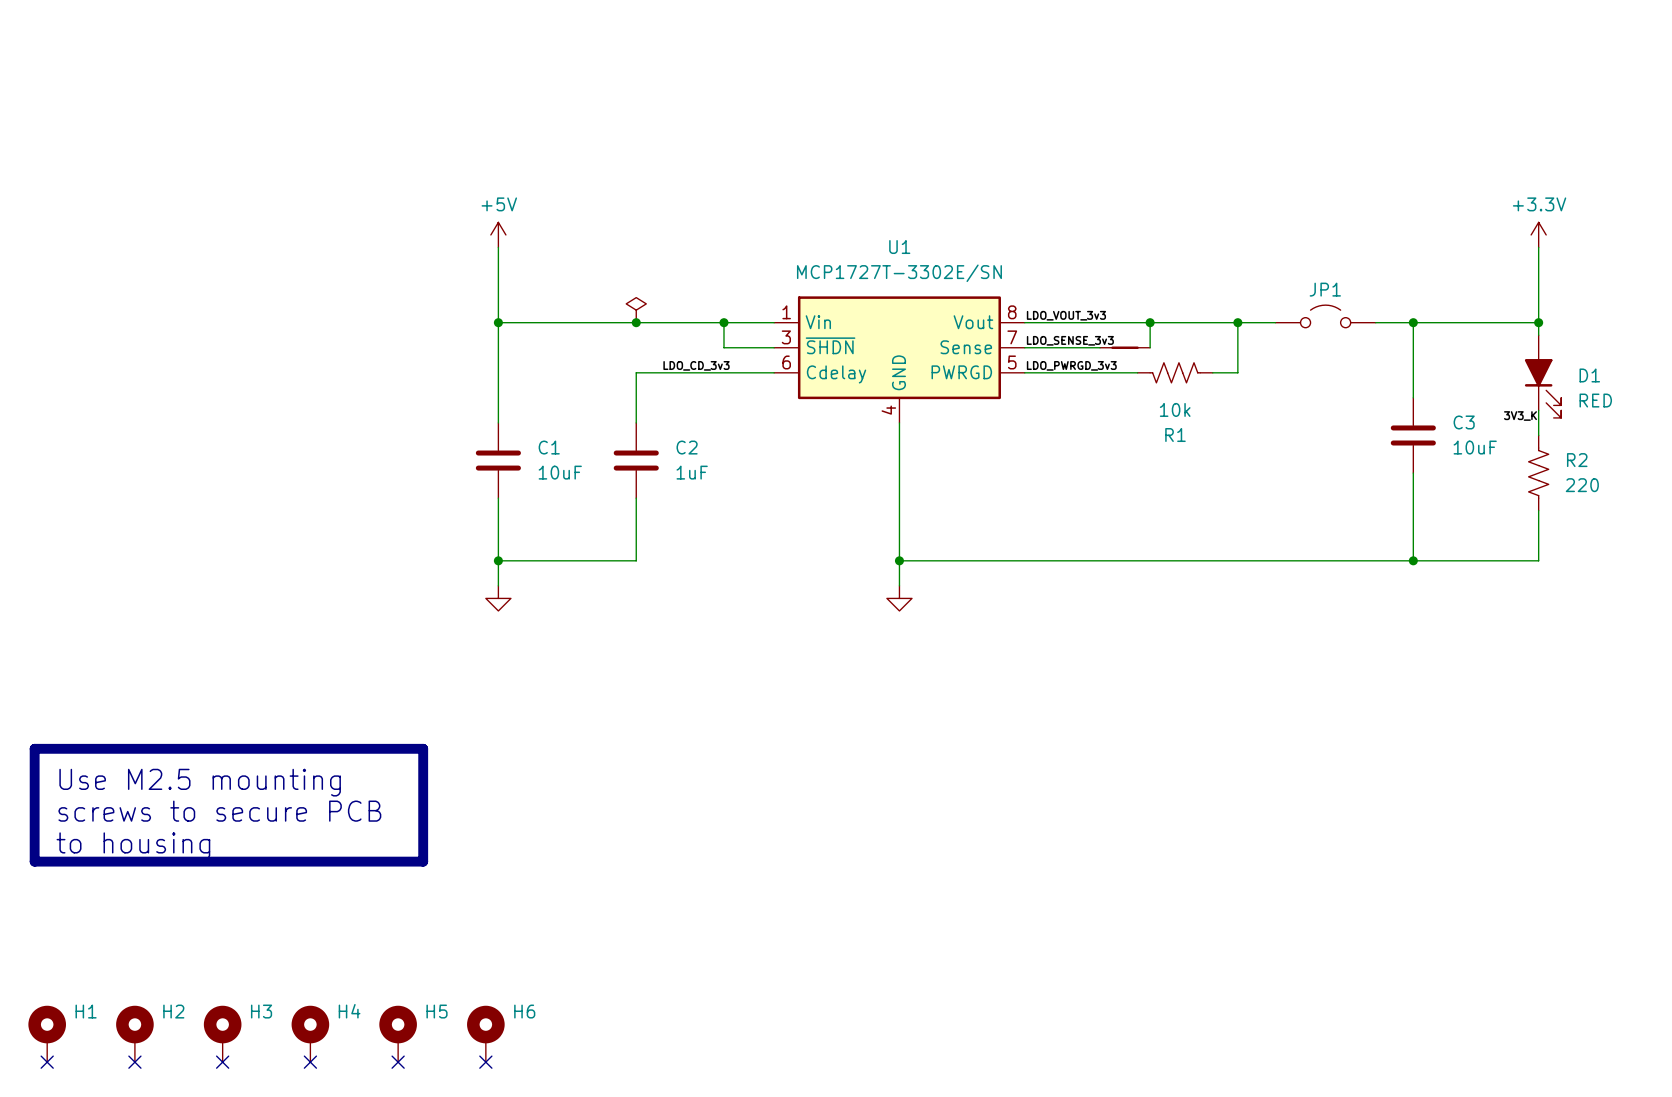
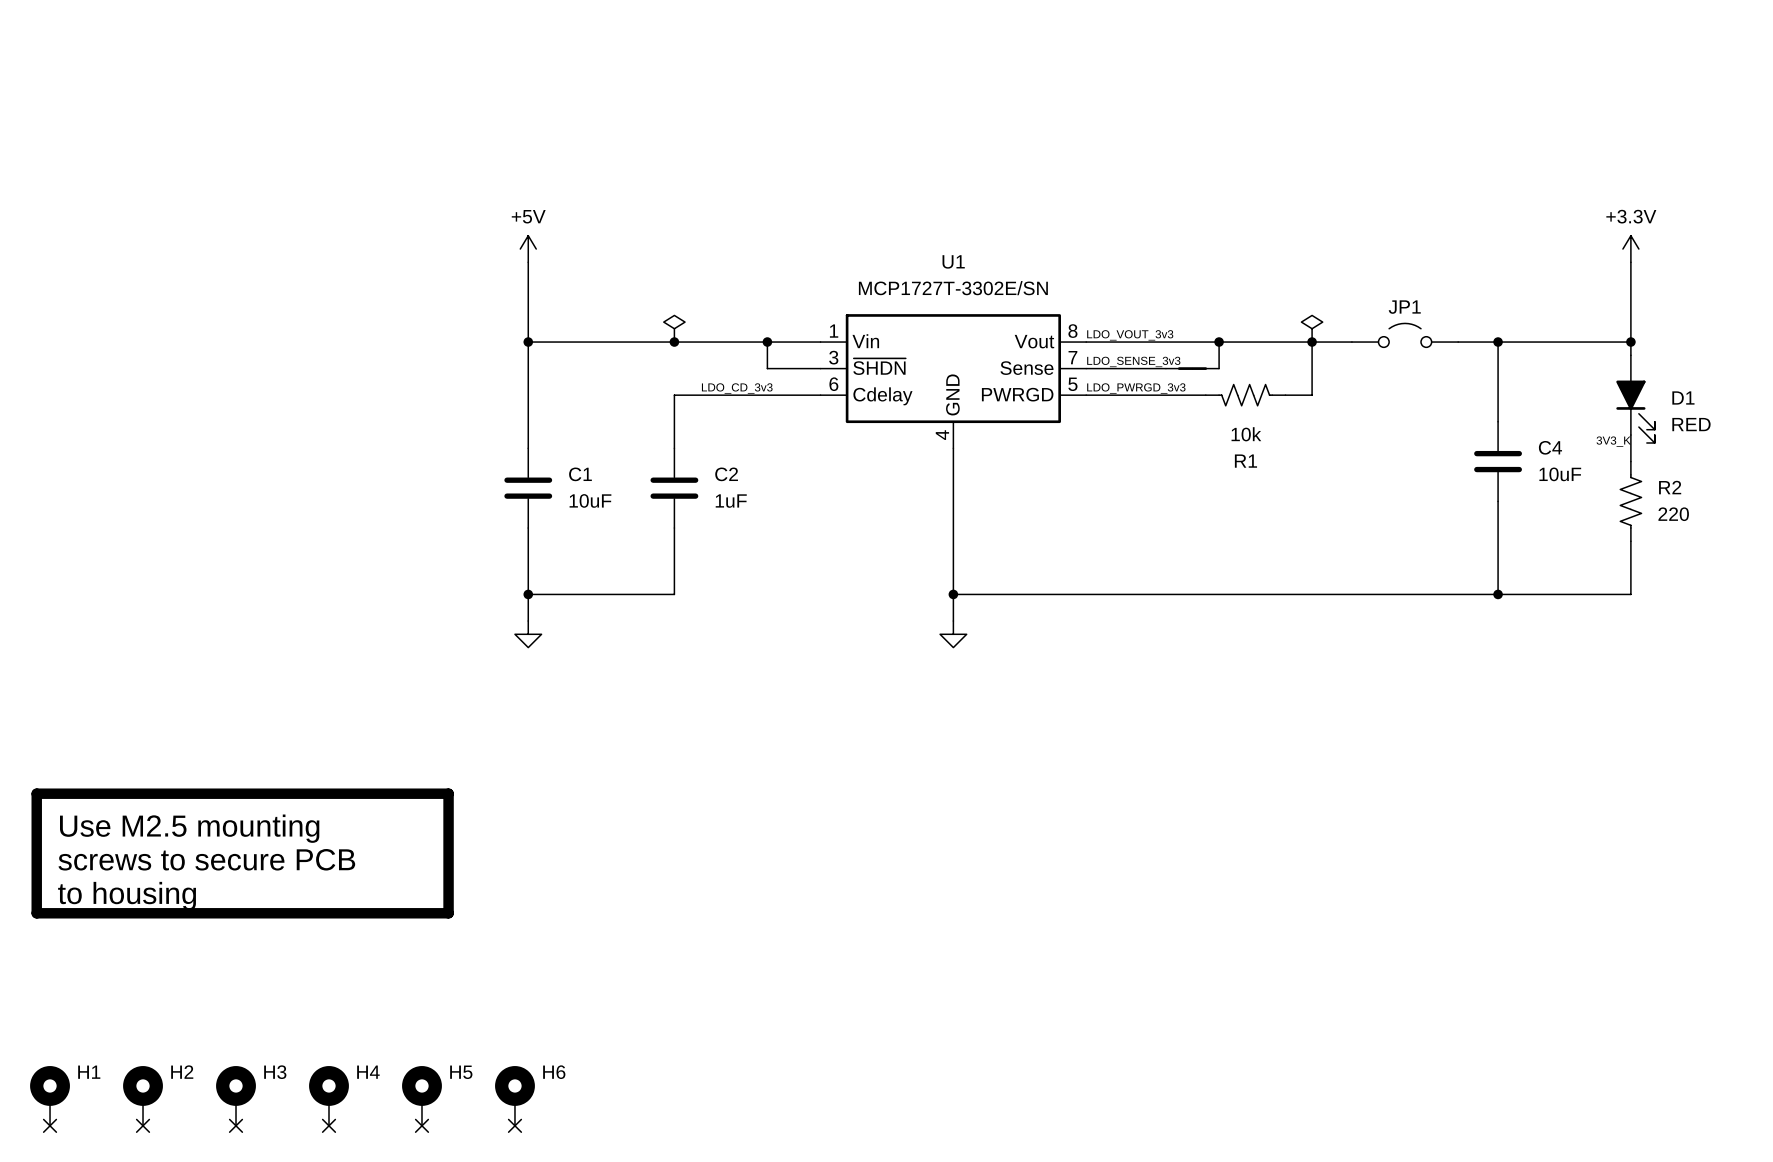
power symbol: none -> (1312, 328)
C3 name: C3 (1464, 422) -> C4 (1550, 447)

